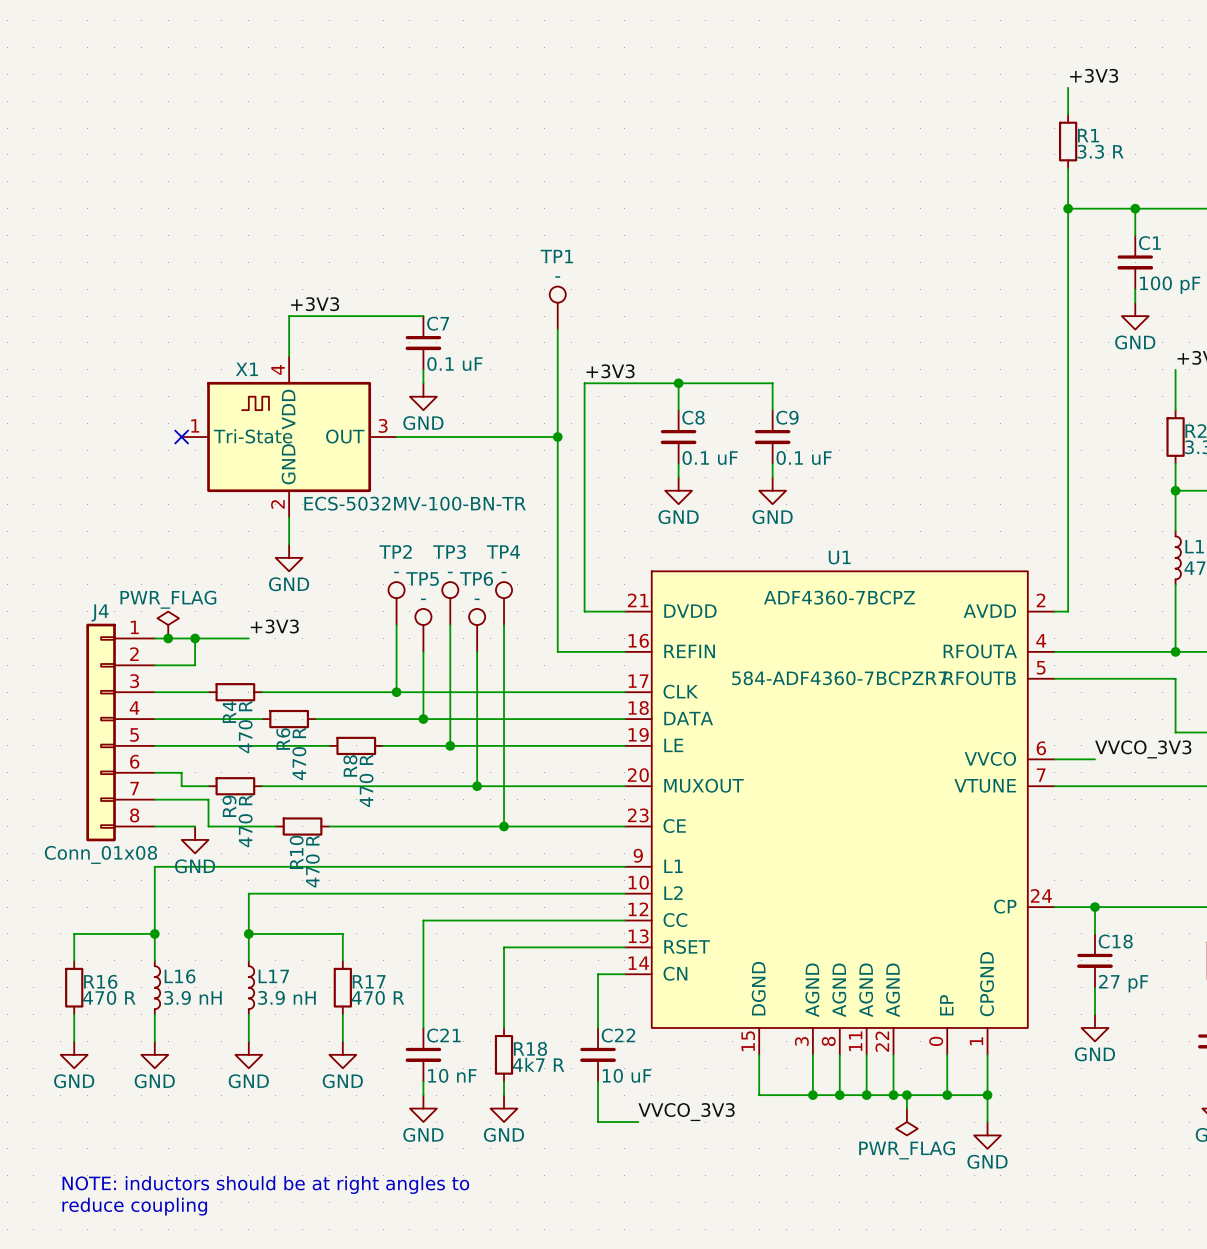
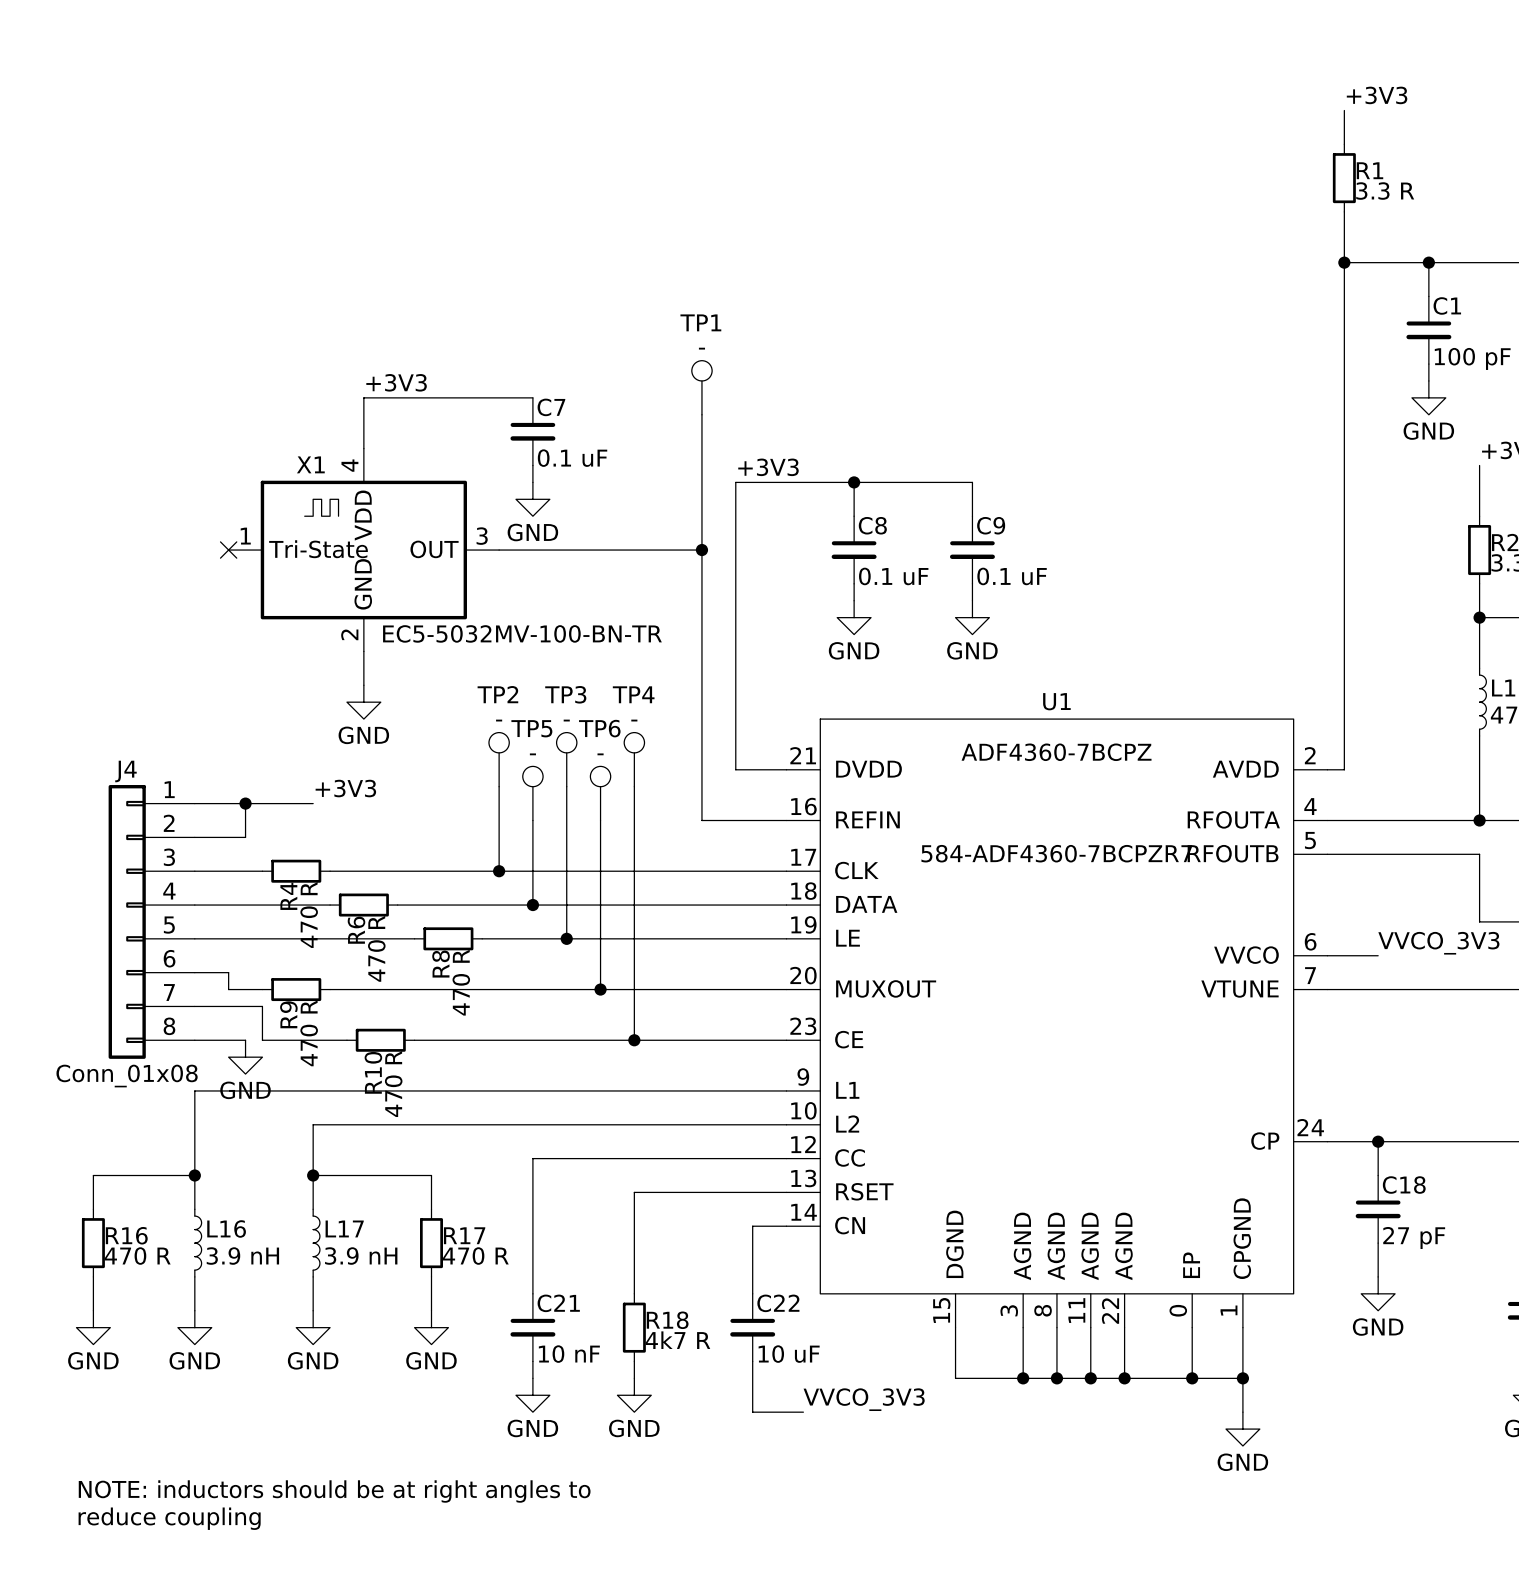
X1 value: ECS-5032MV-100-BN-TR (415, 503) -> EC5-5032MV-100-BN-TR (522, 633)
power symbol: PWR_FLAG (168, 625) -> none
junction: (168, 638) -> none
wire: (906, 1095) (906, 1108) -> none
junction: (906, 1095) -> none
power symbol: PWR_FLAG (906, 1122) -> none

